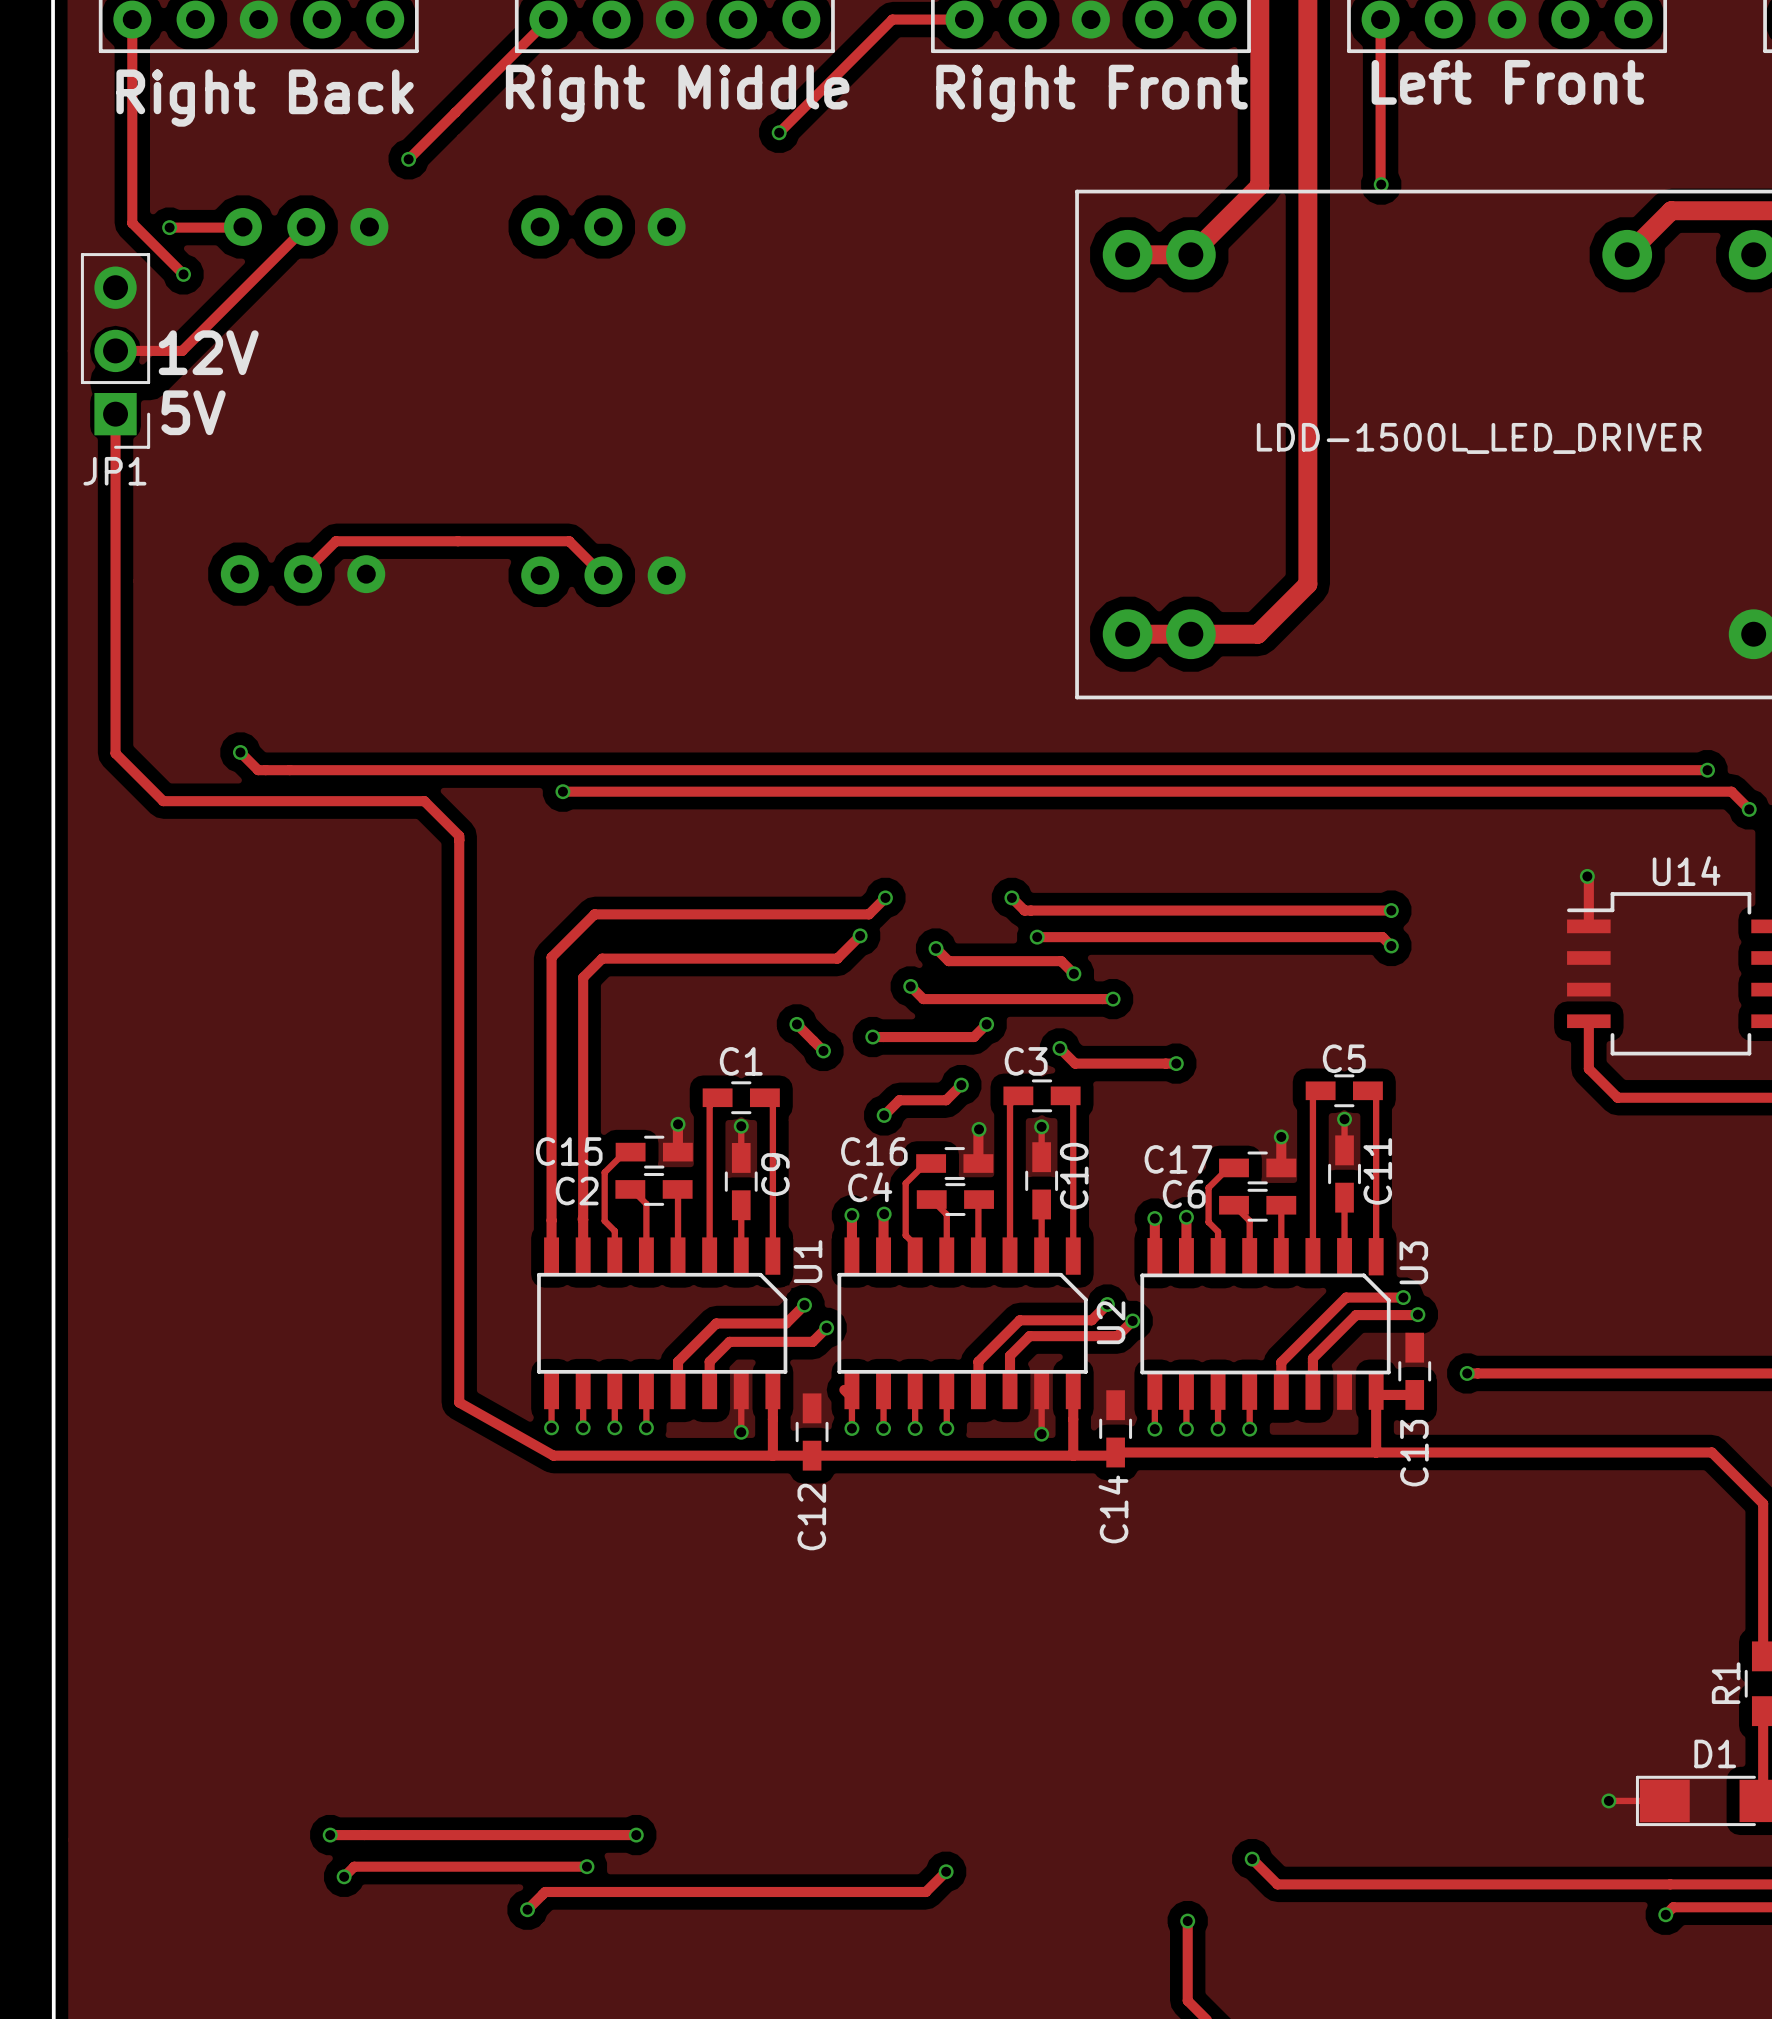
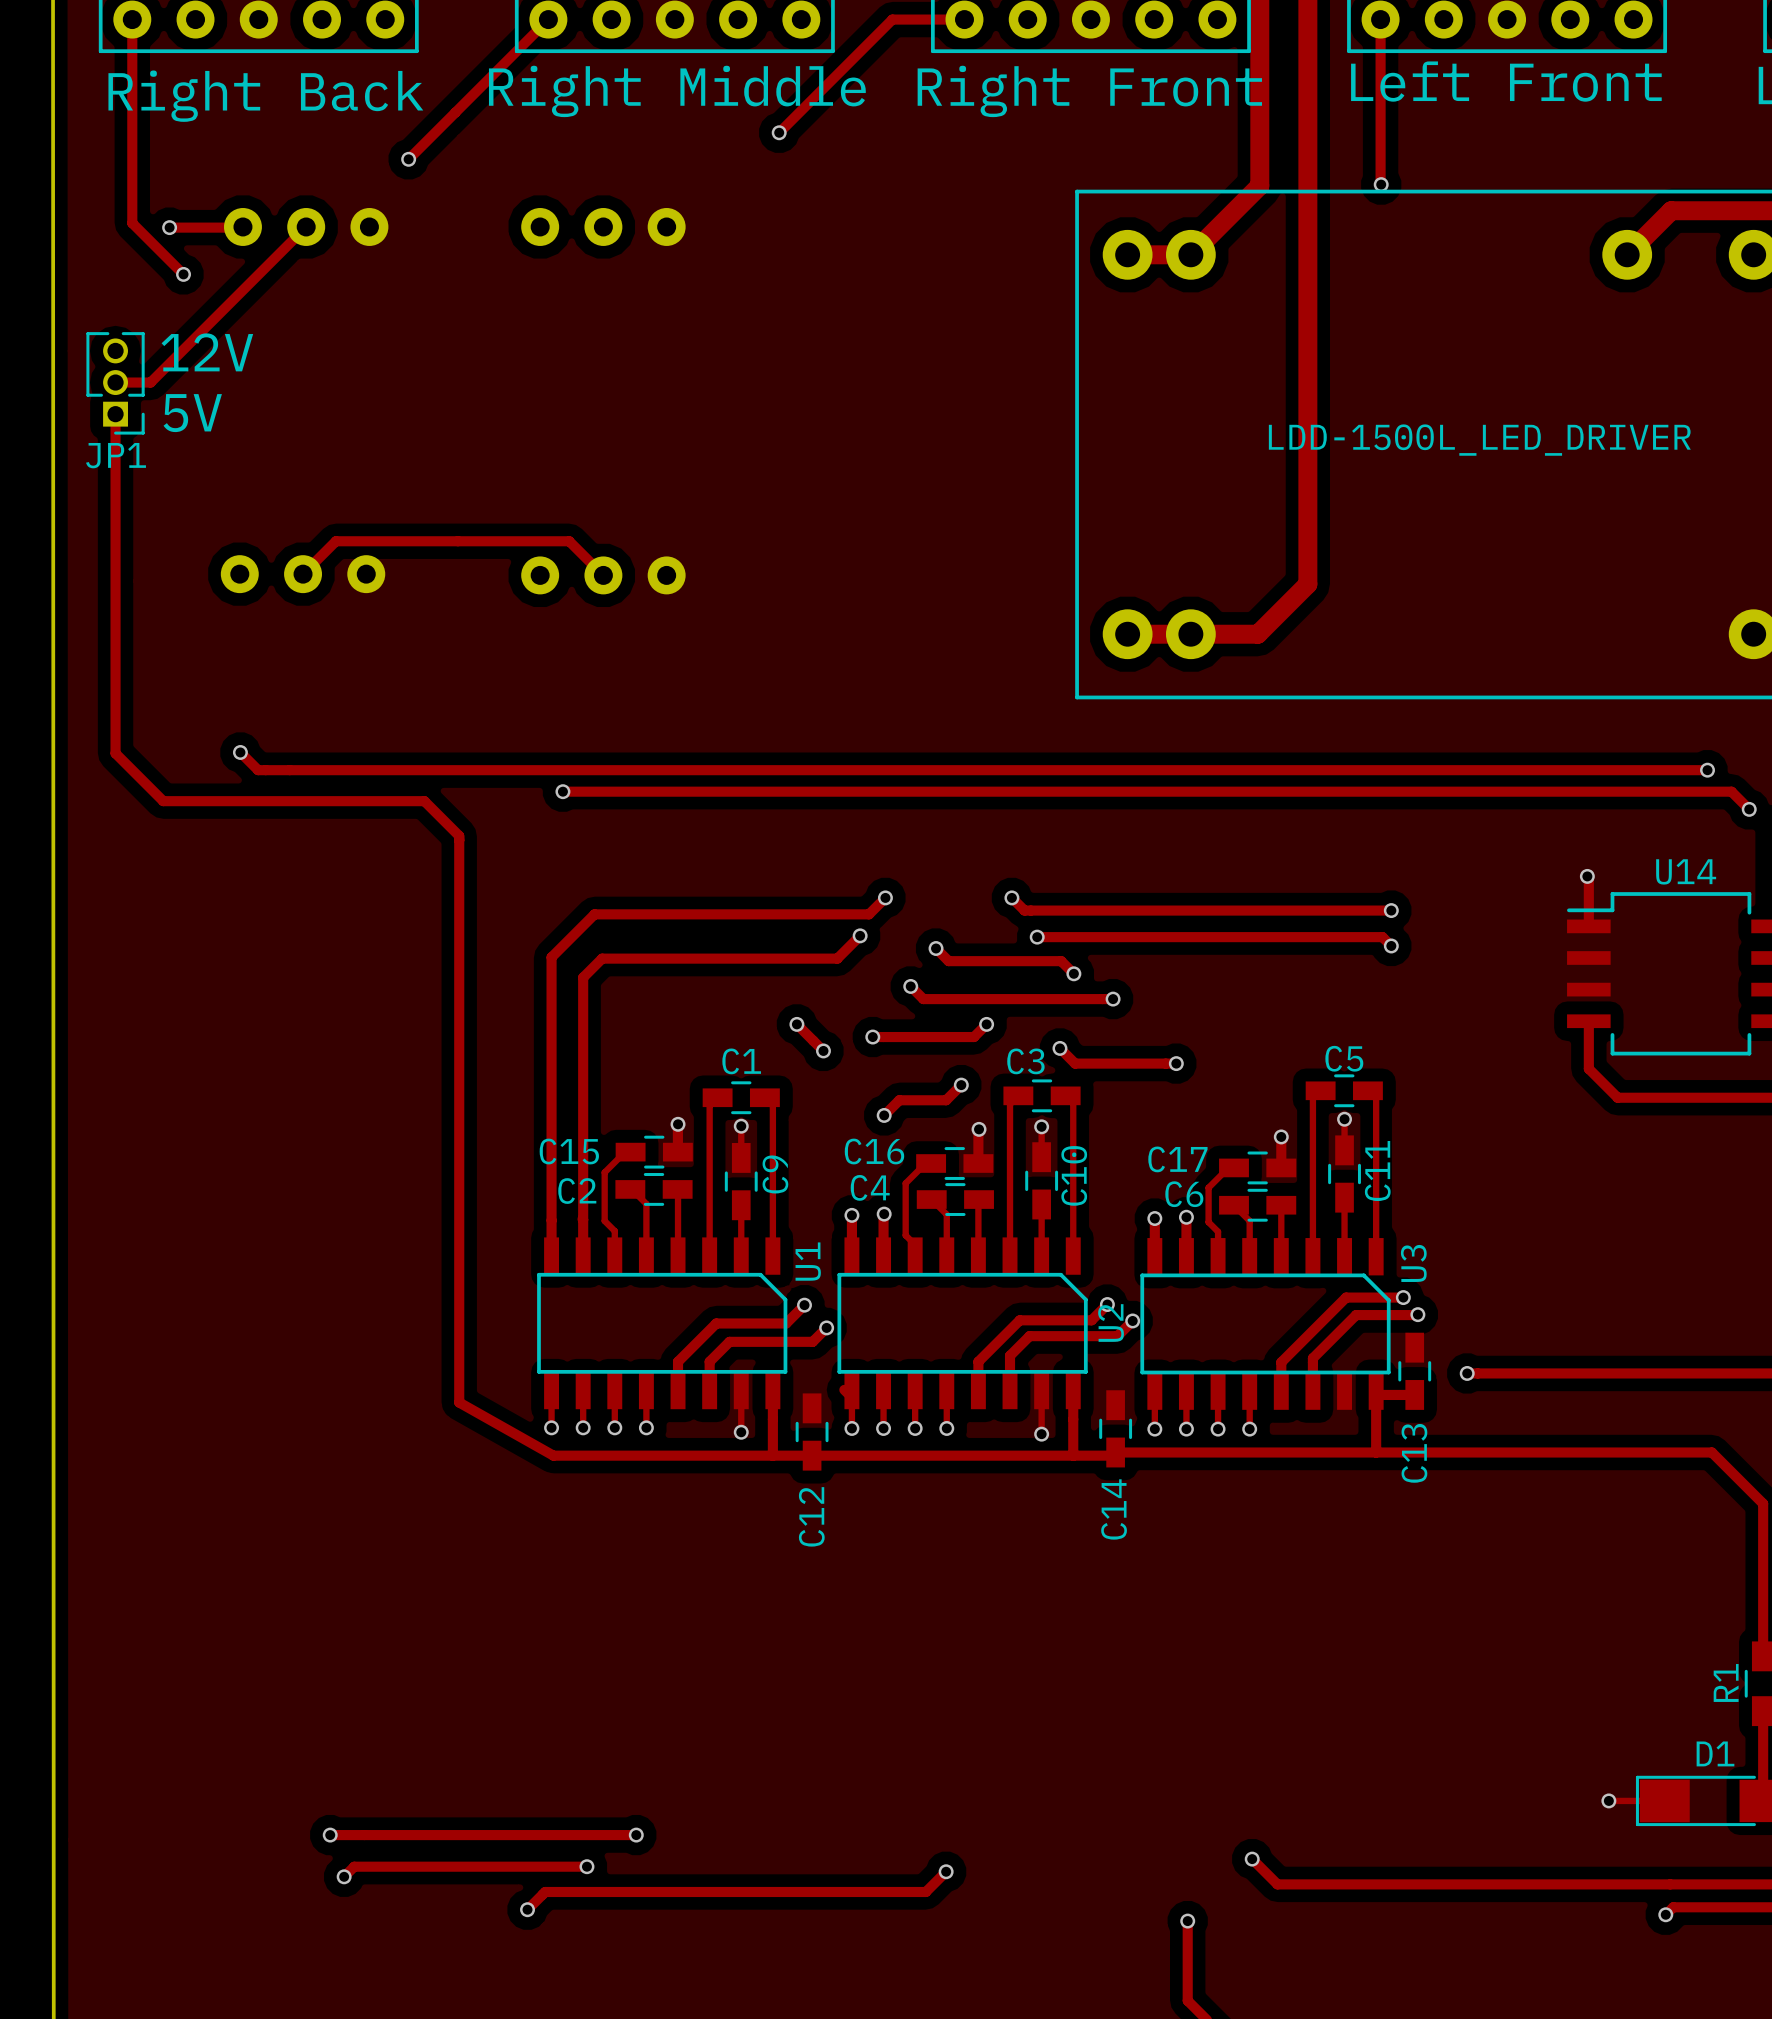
JP1 footprint: [80, 253, 151, 449] -> [86, 332, 145, 435]
track: (115, 350) (182, 350) -> (115, 382) (150, 382) (182, 350)

